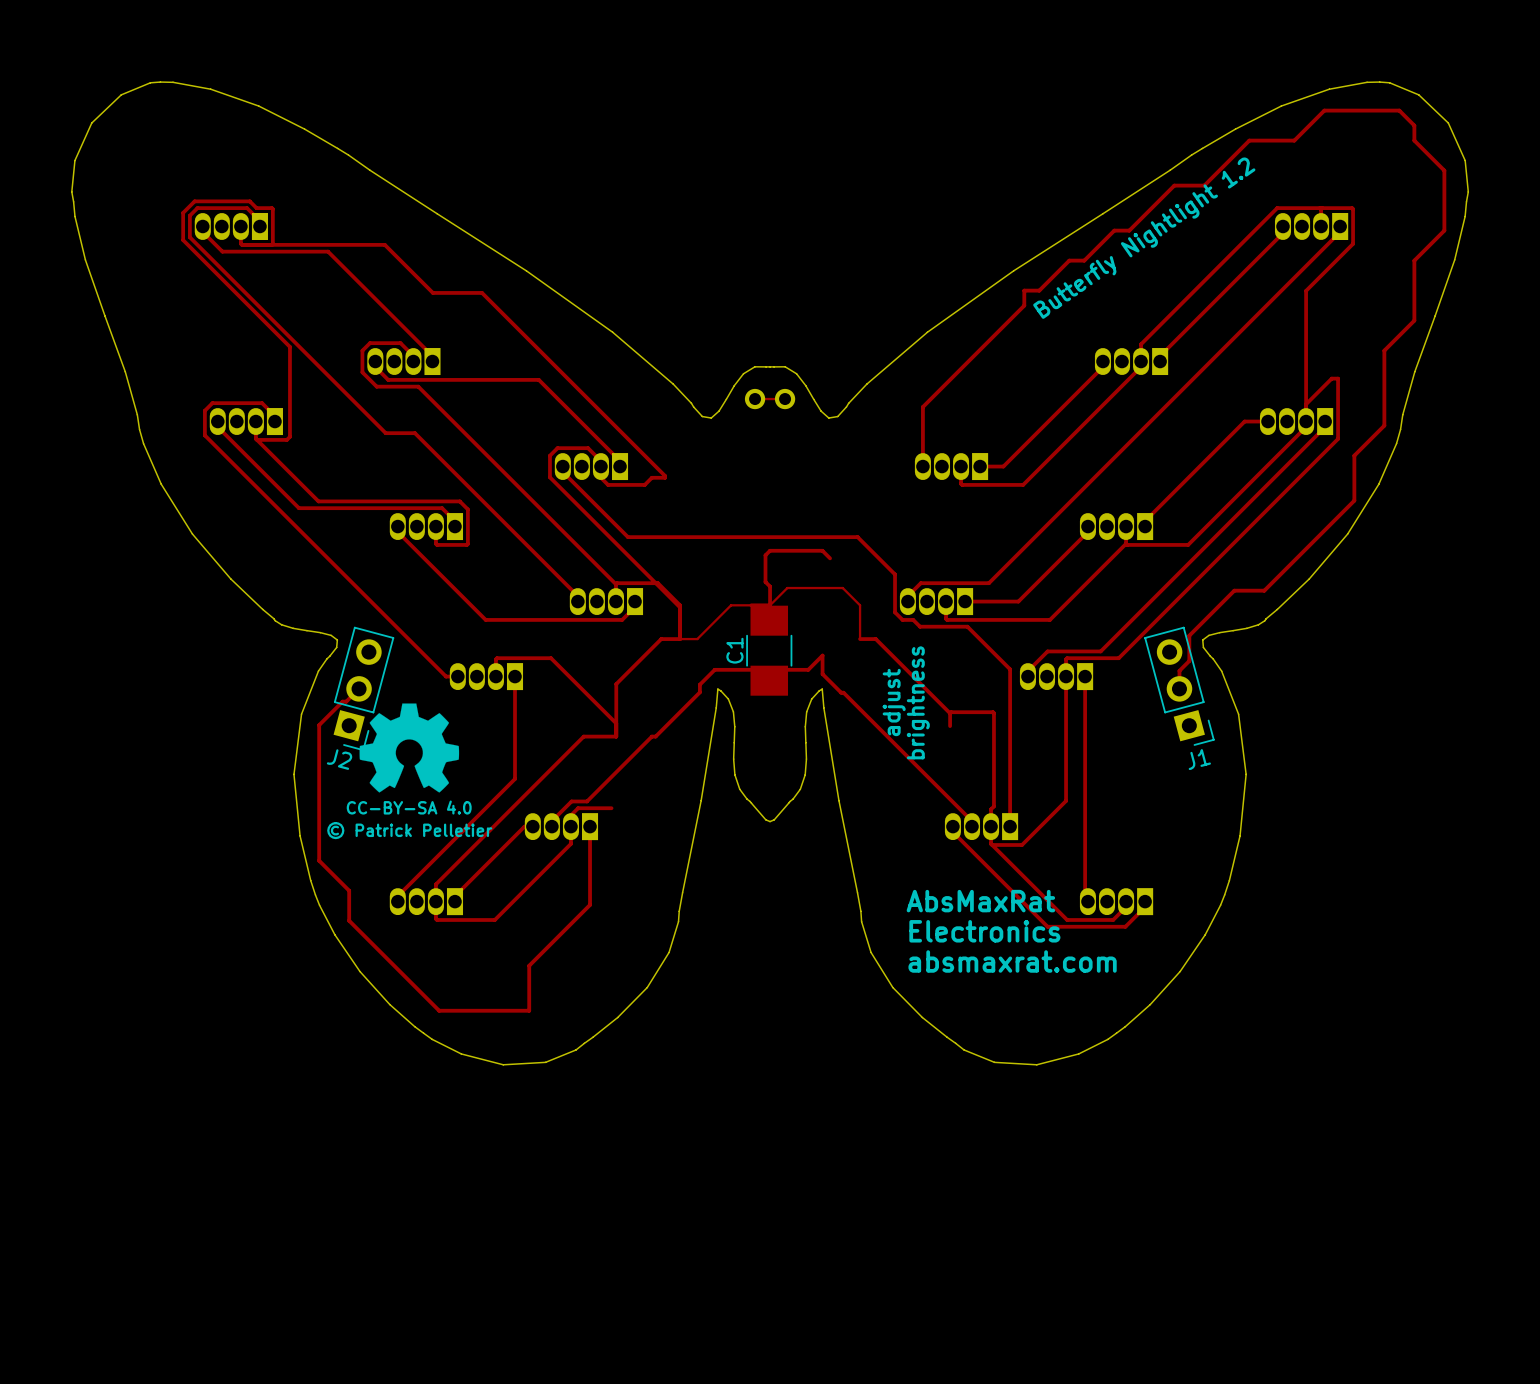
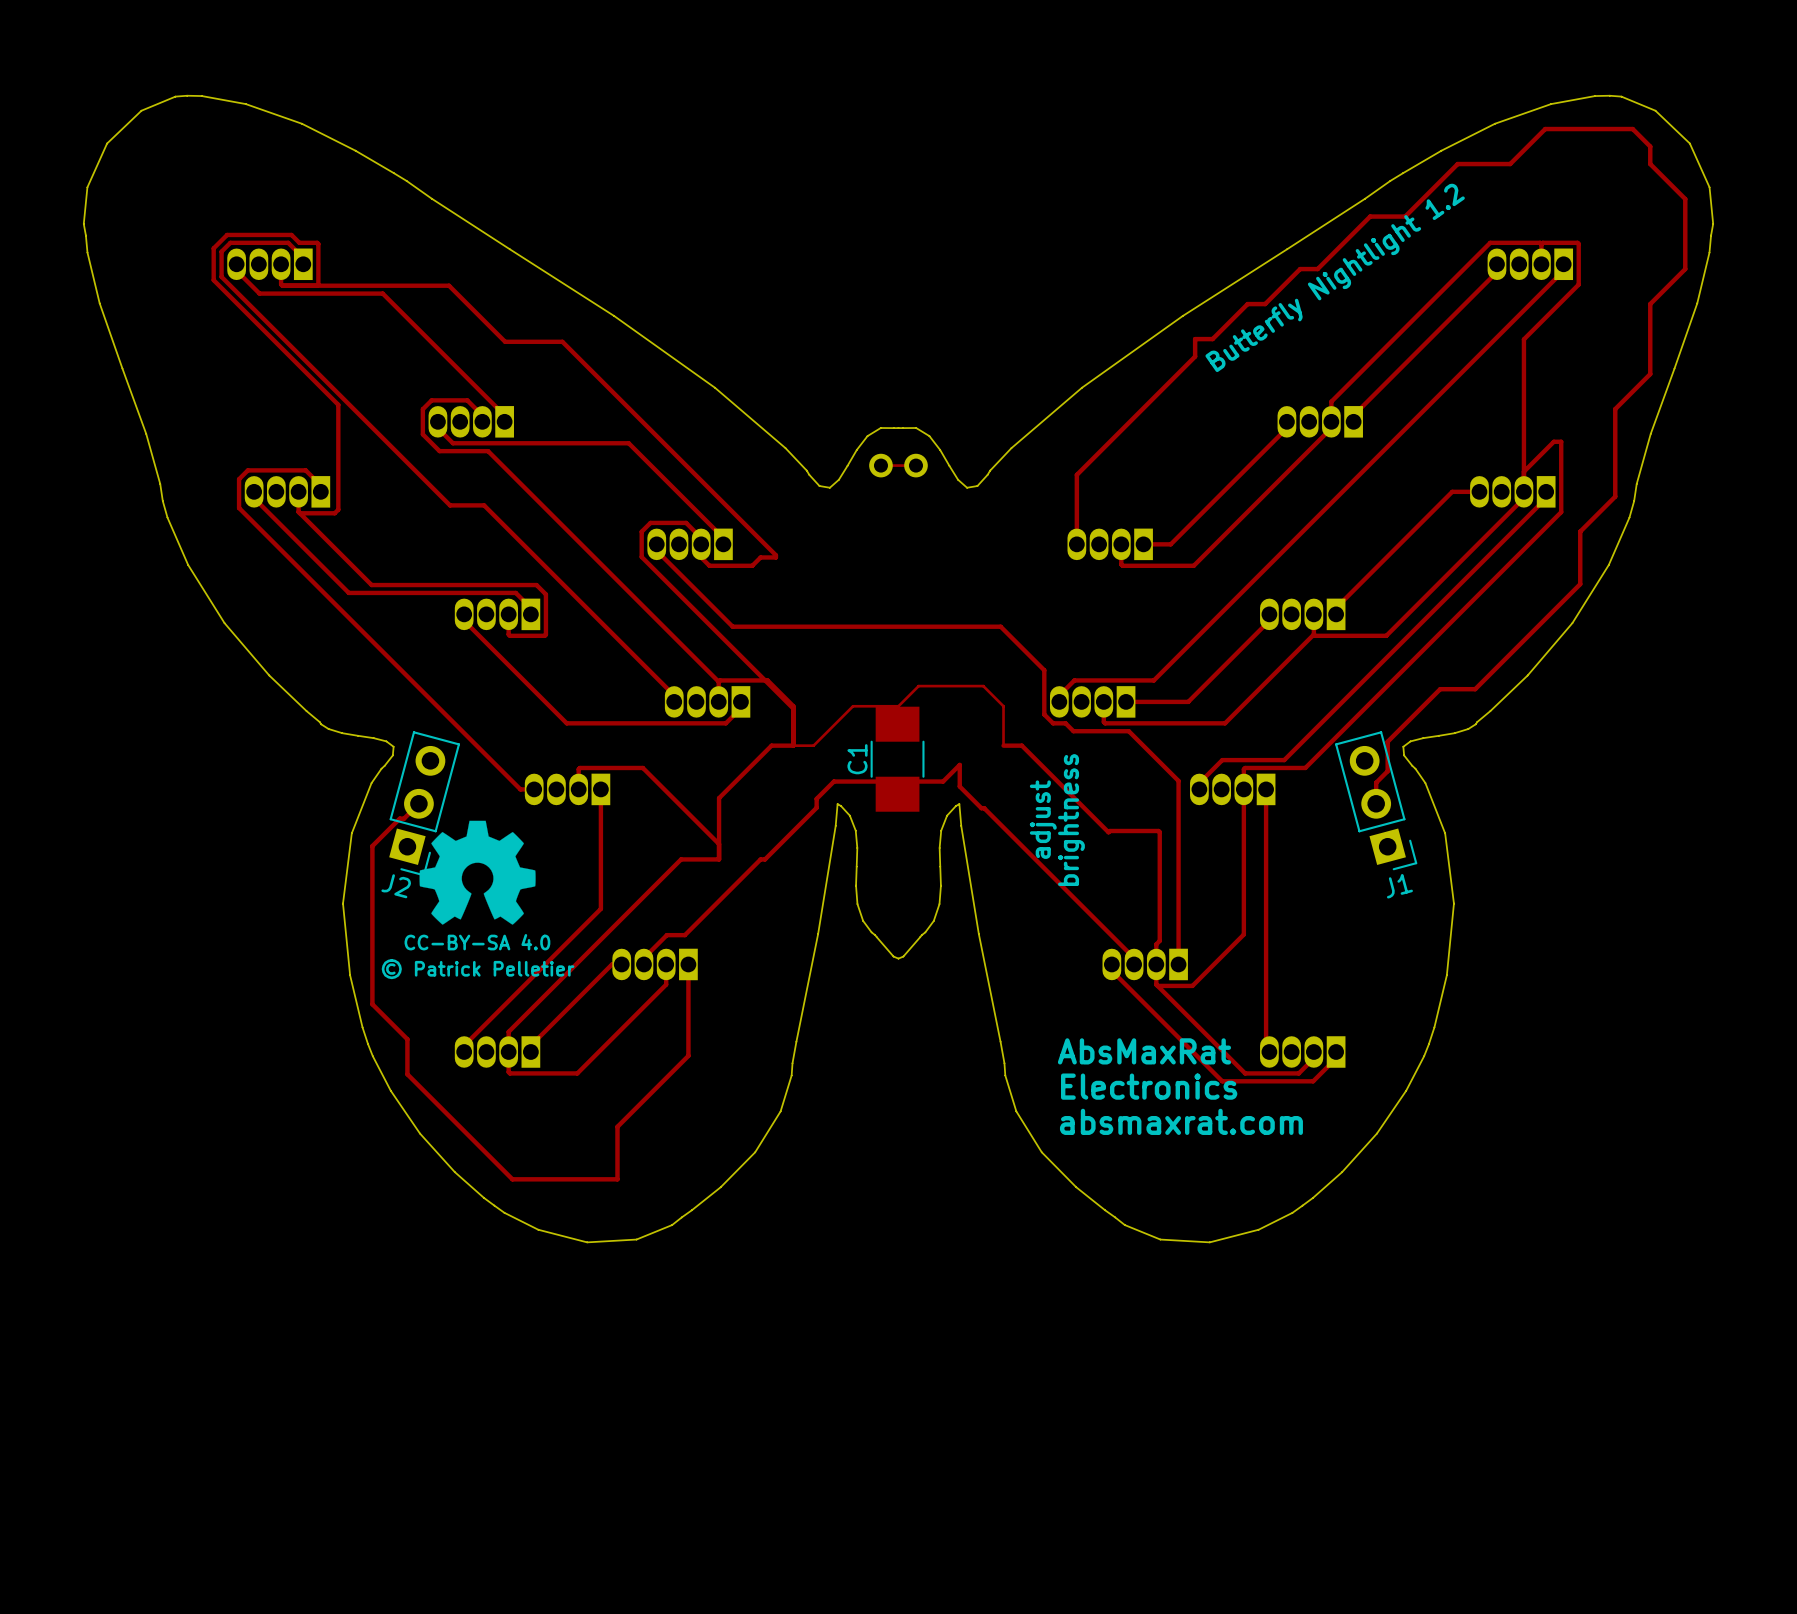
top track: (830, 558) (822, 550) (770, 550) (765, 555) (765, 582) (770, 586) (770, 605) (751, 605) -> none
top track: (950, 713) (950, 726) -> none
top track: (611, 808) (578, 808) (570, 815) -> none

